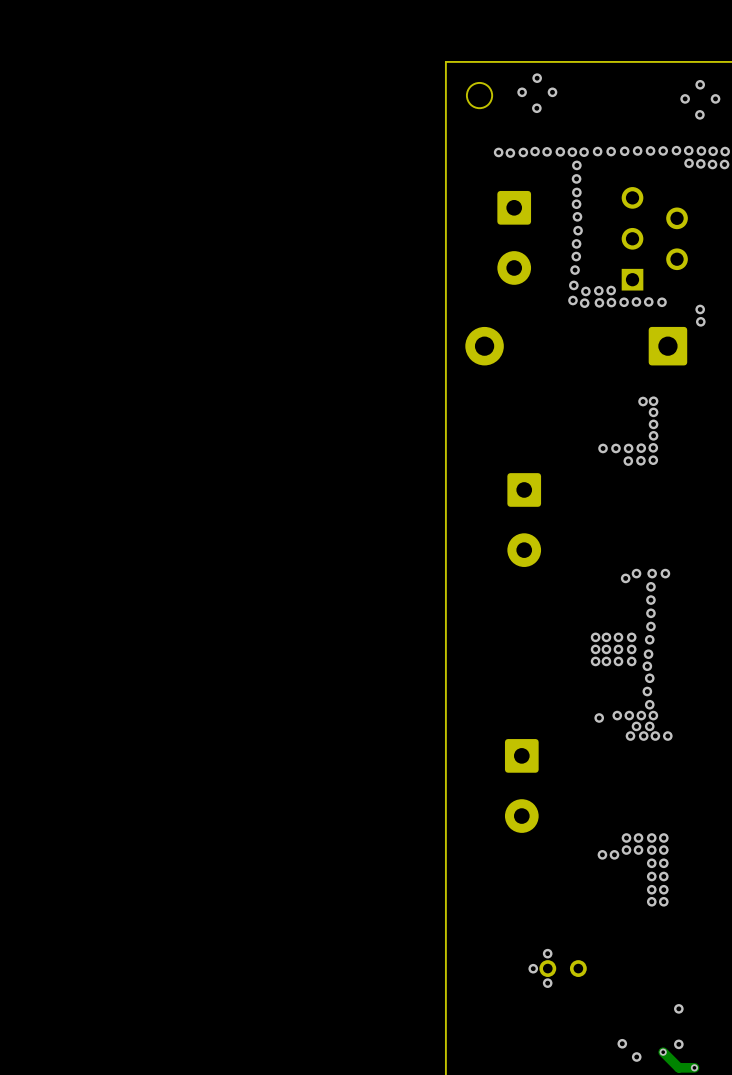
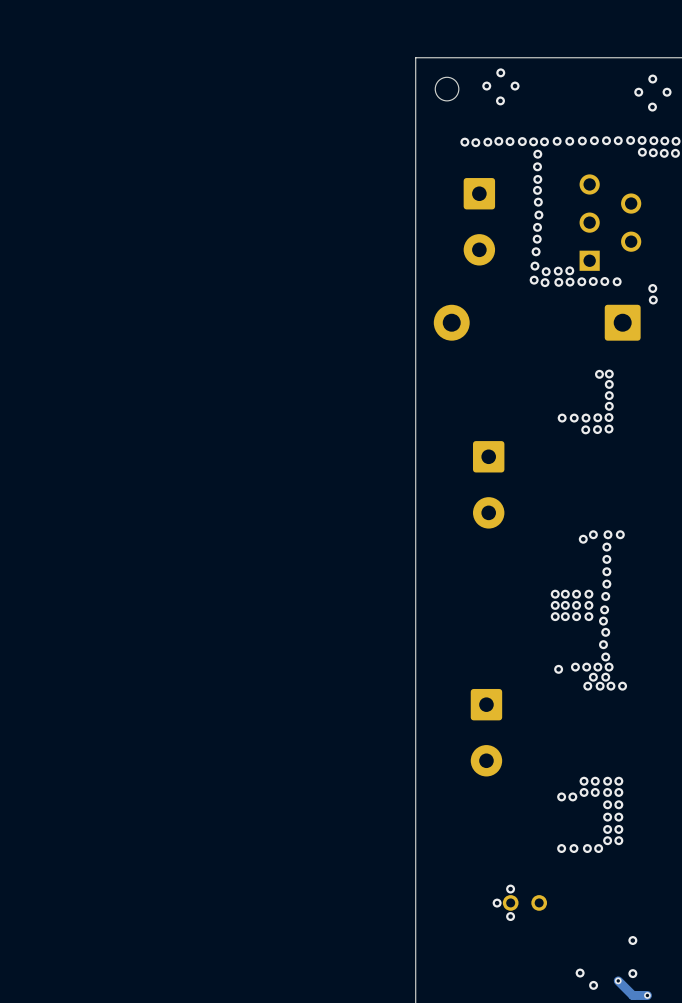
via: none -> (561, 848)
via: none -> (573, 848)
via: none -> (587, 848)
via: none -> (598, 848)

